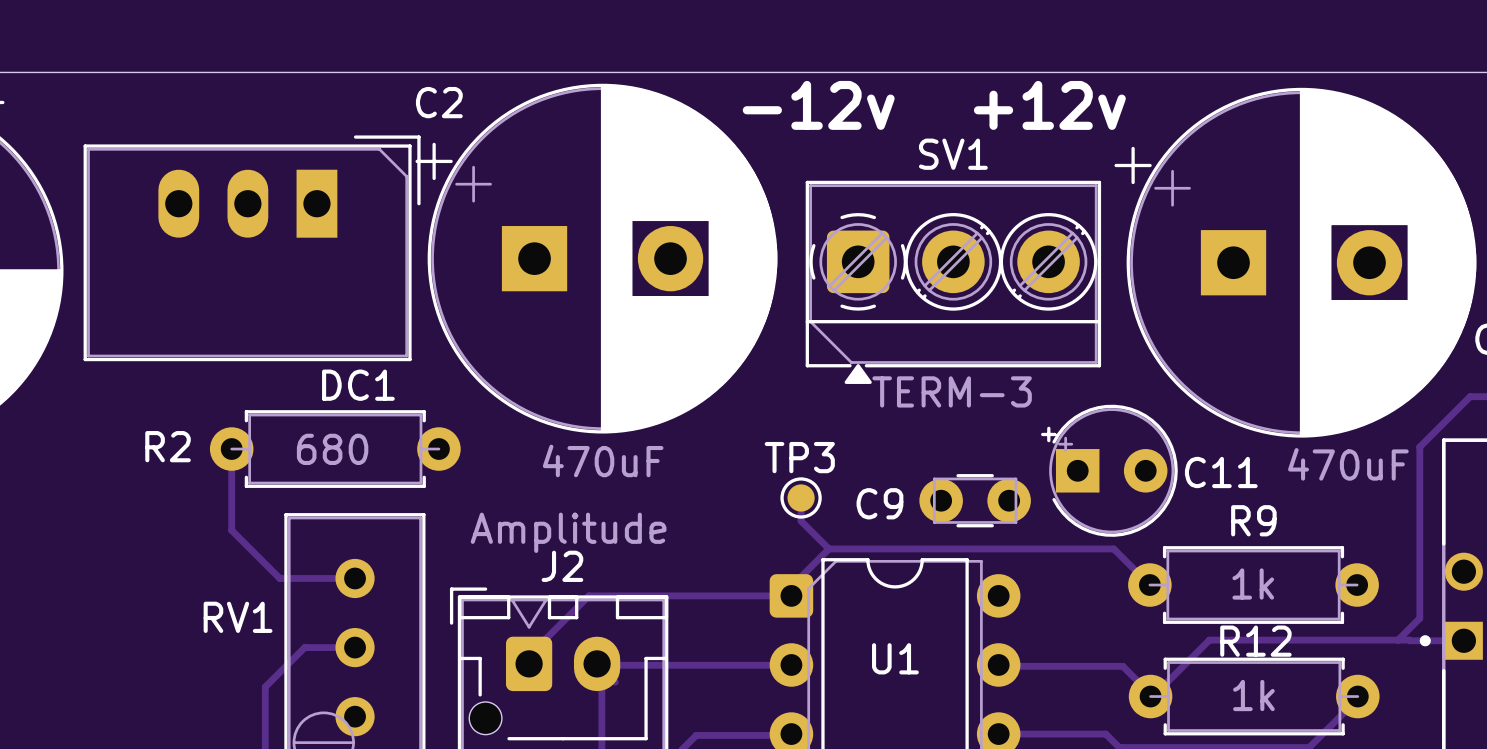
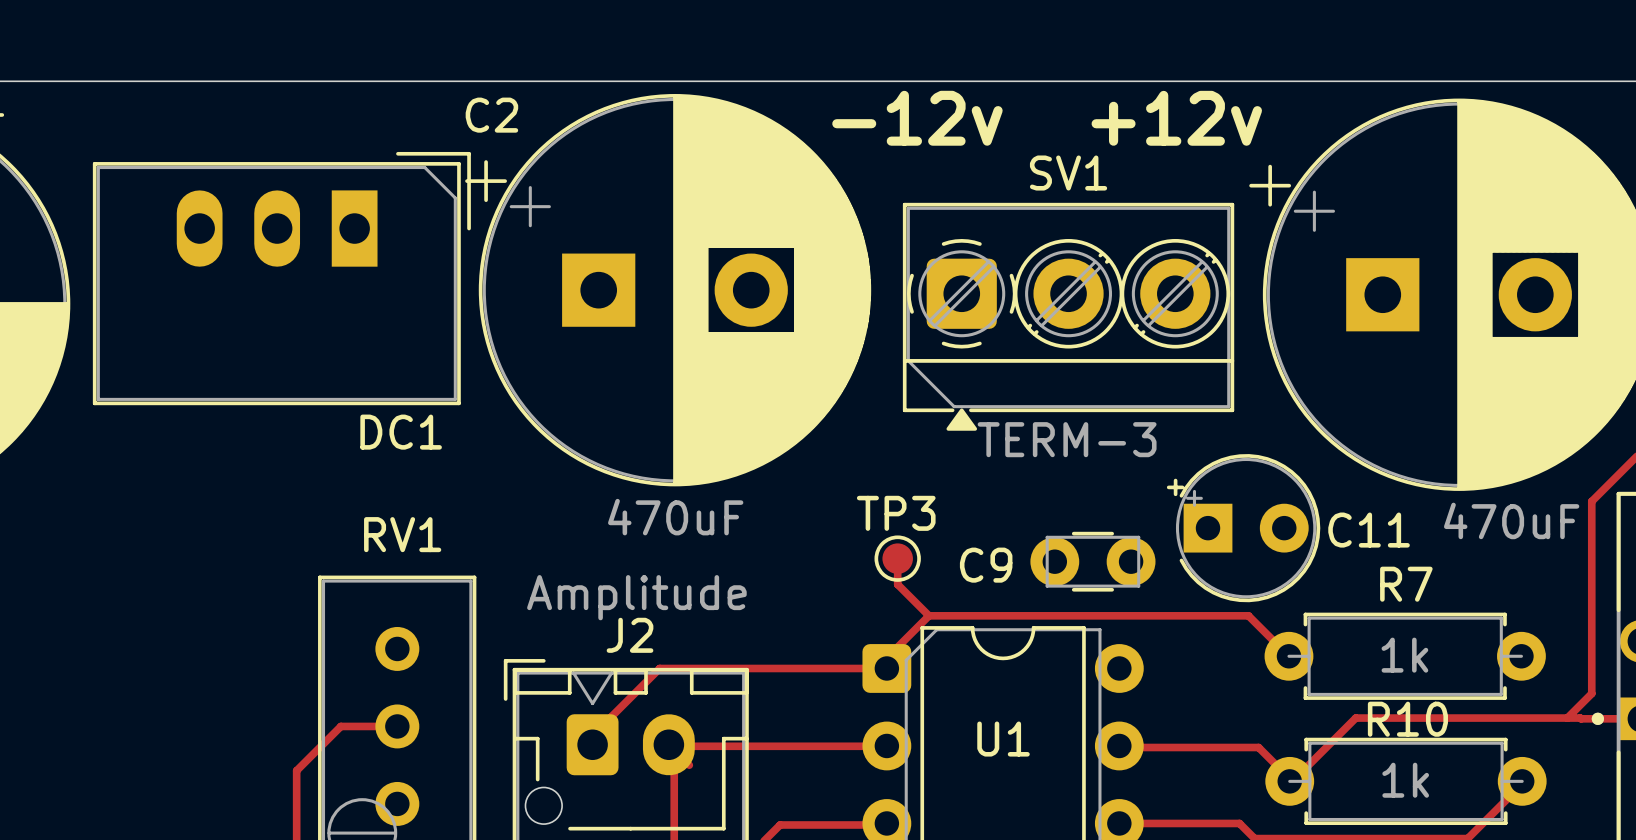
track: (231, 449) (231, 530) (279, 578) (355, 578) -> none
R2: 680 (335, 449) -> none
R9 name: R9 (1253, 520) -> R7 (1406, 584)
RV1 name position: RV1 (238, 617) -> RV1 (402, 534)
R12 name: R12 (1255, 641) -> R10 (1407, 719)

